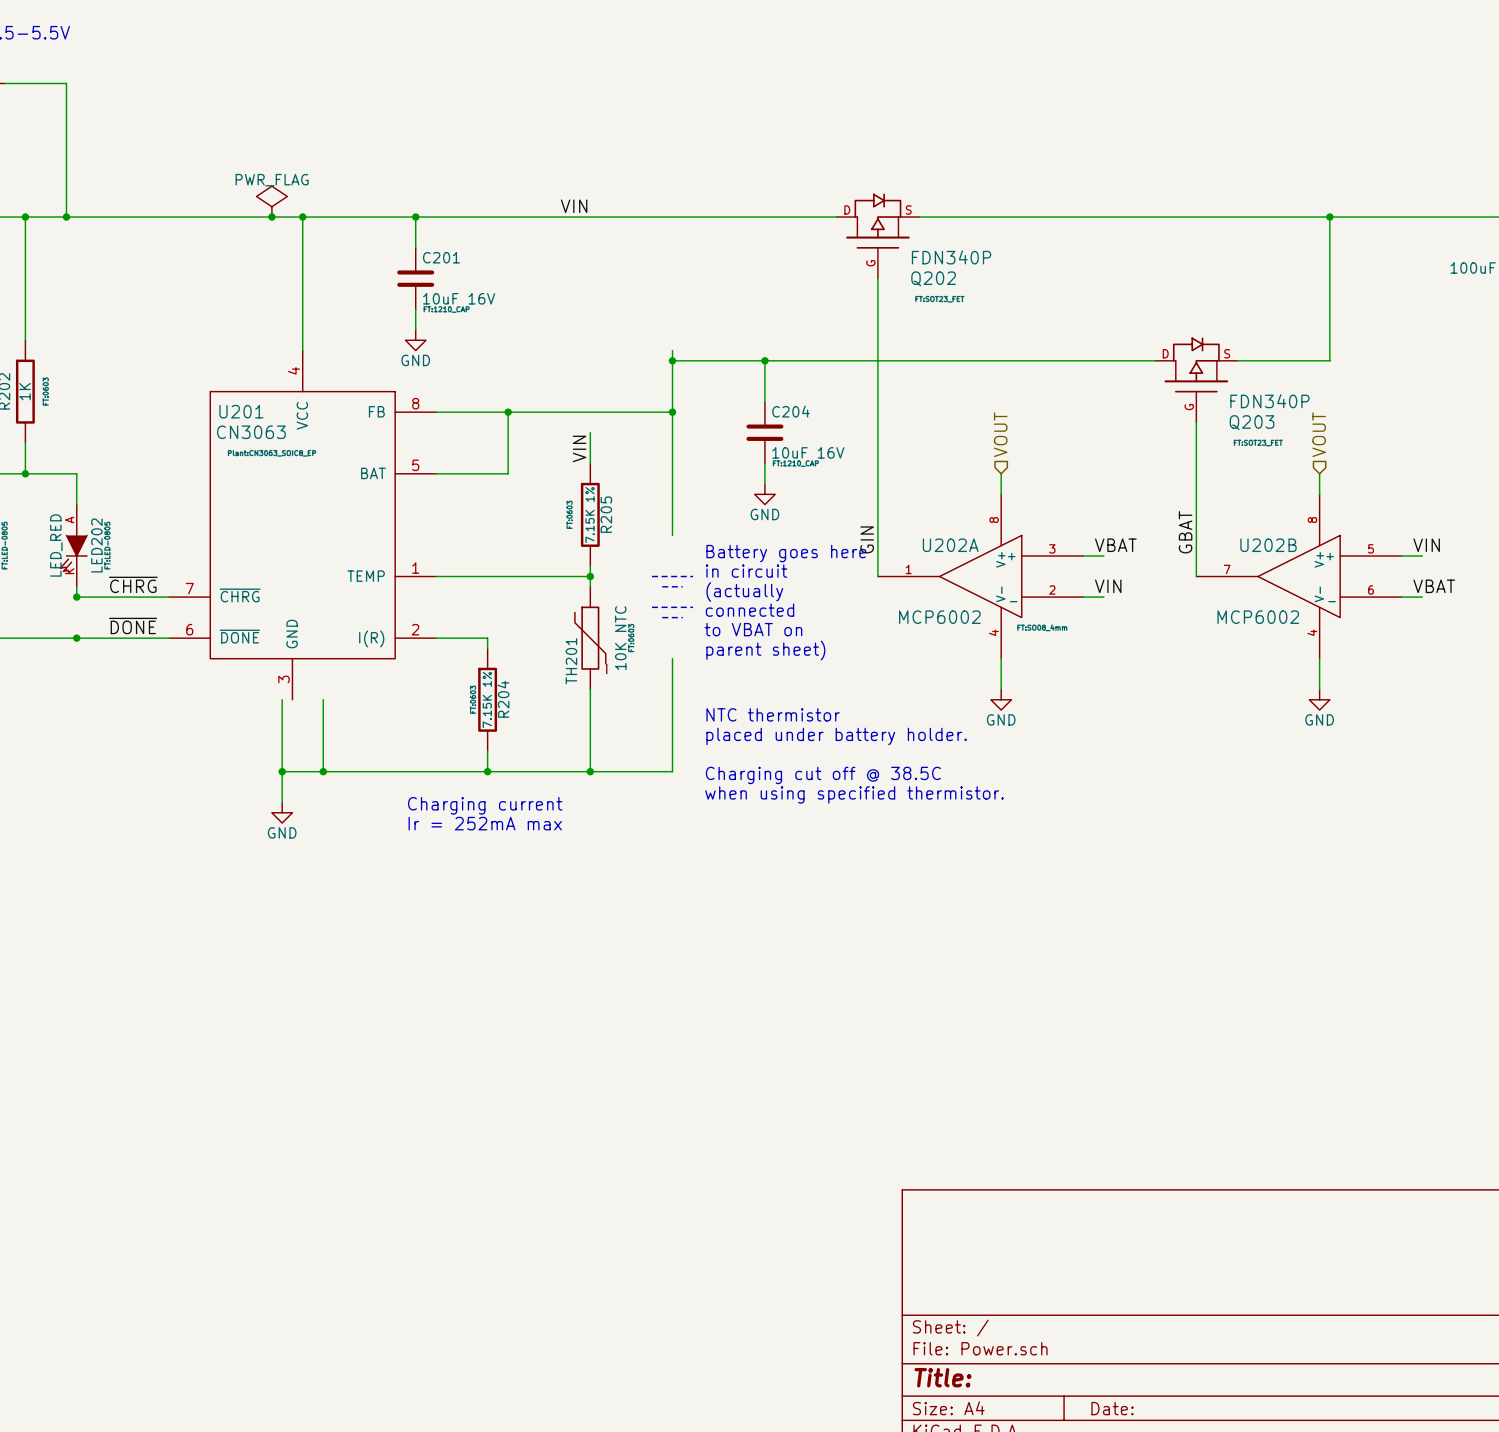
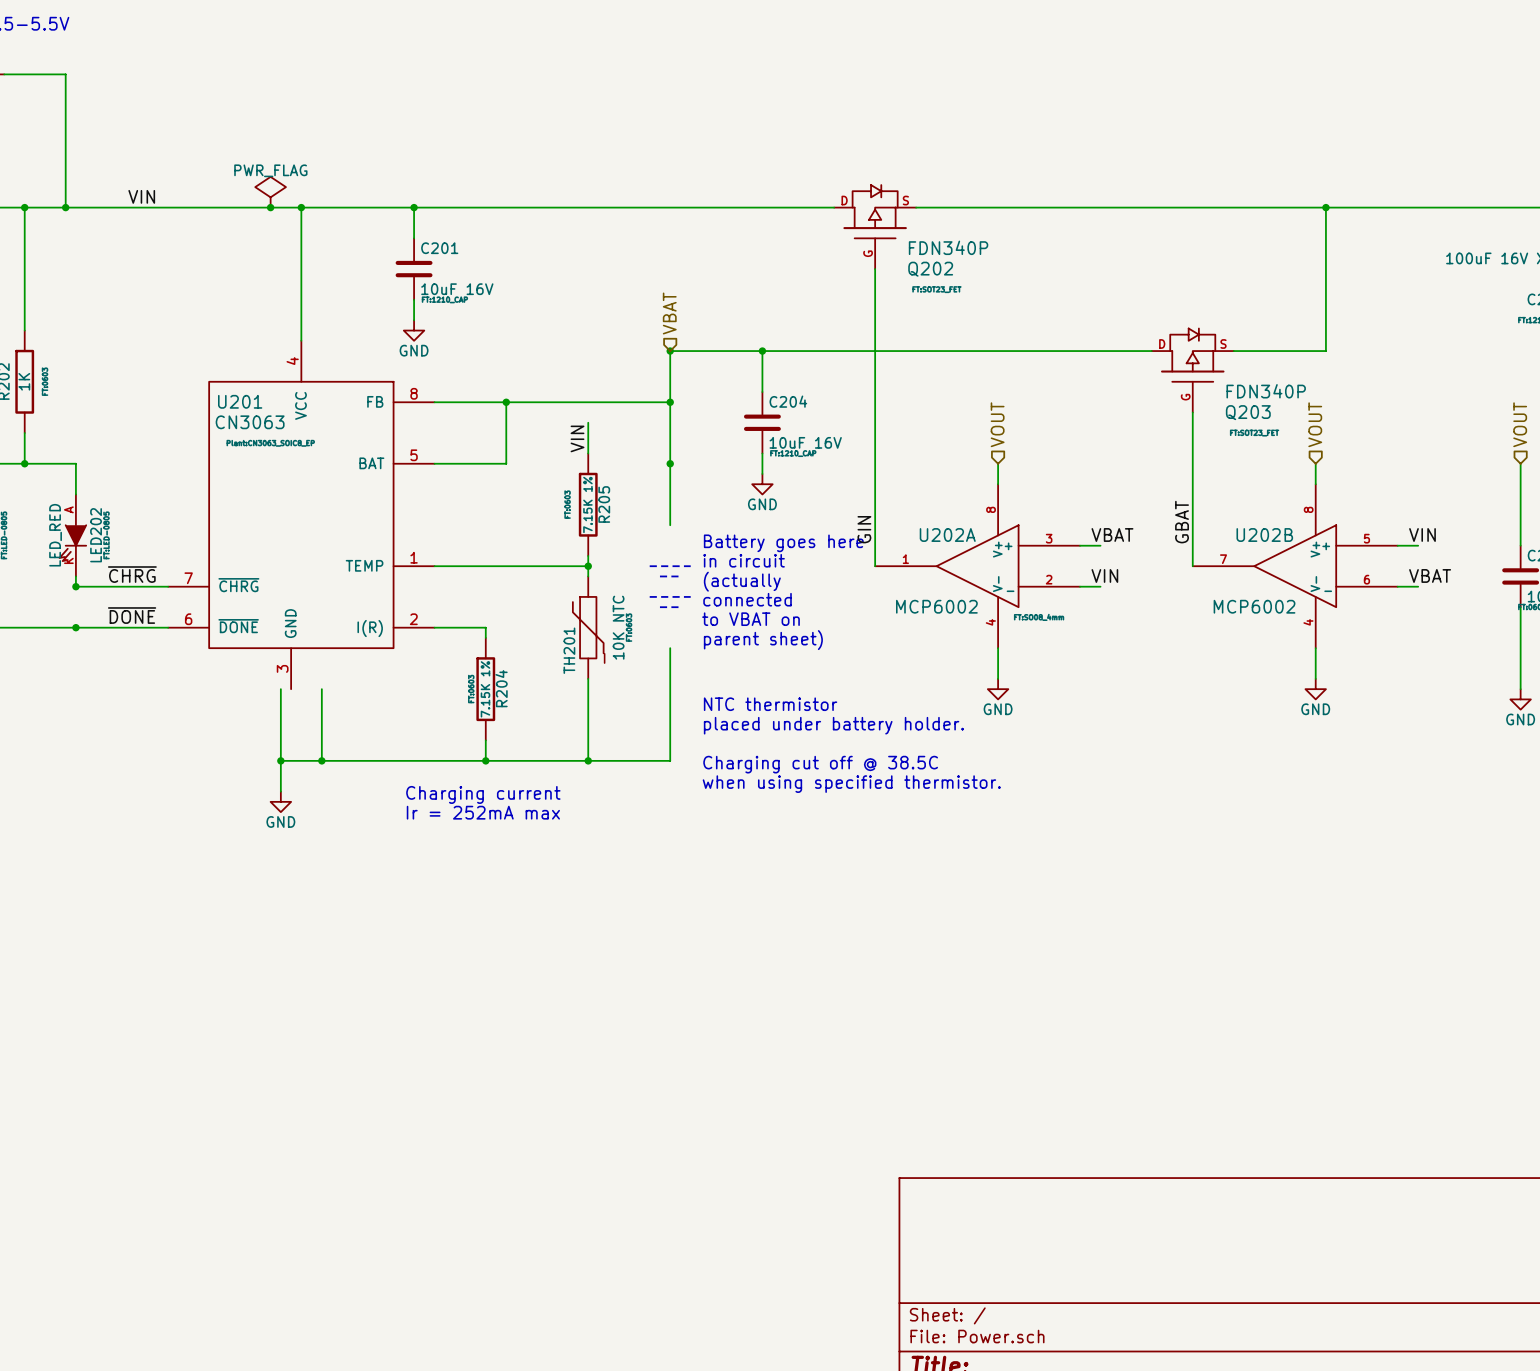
label: none -> VIN (141, 196)
label: VIN (574, 206) -> none
hierarchical label: none -> VBAT (669, 313)
wire: (672, 350) (672, 360) -> none
junction: none -> (670, 463)

